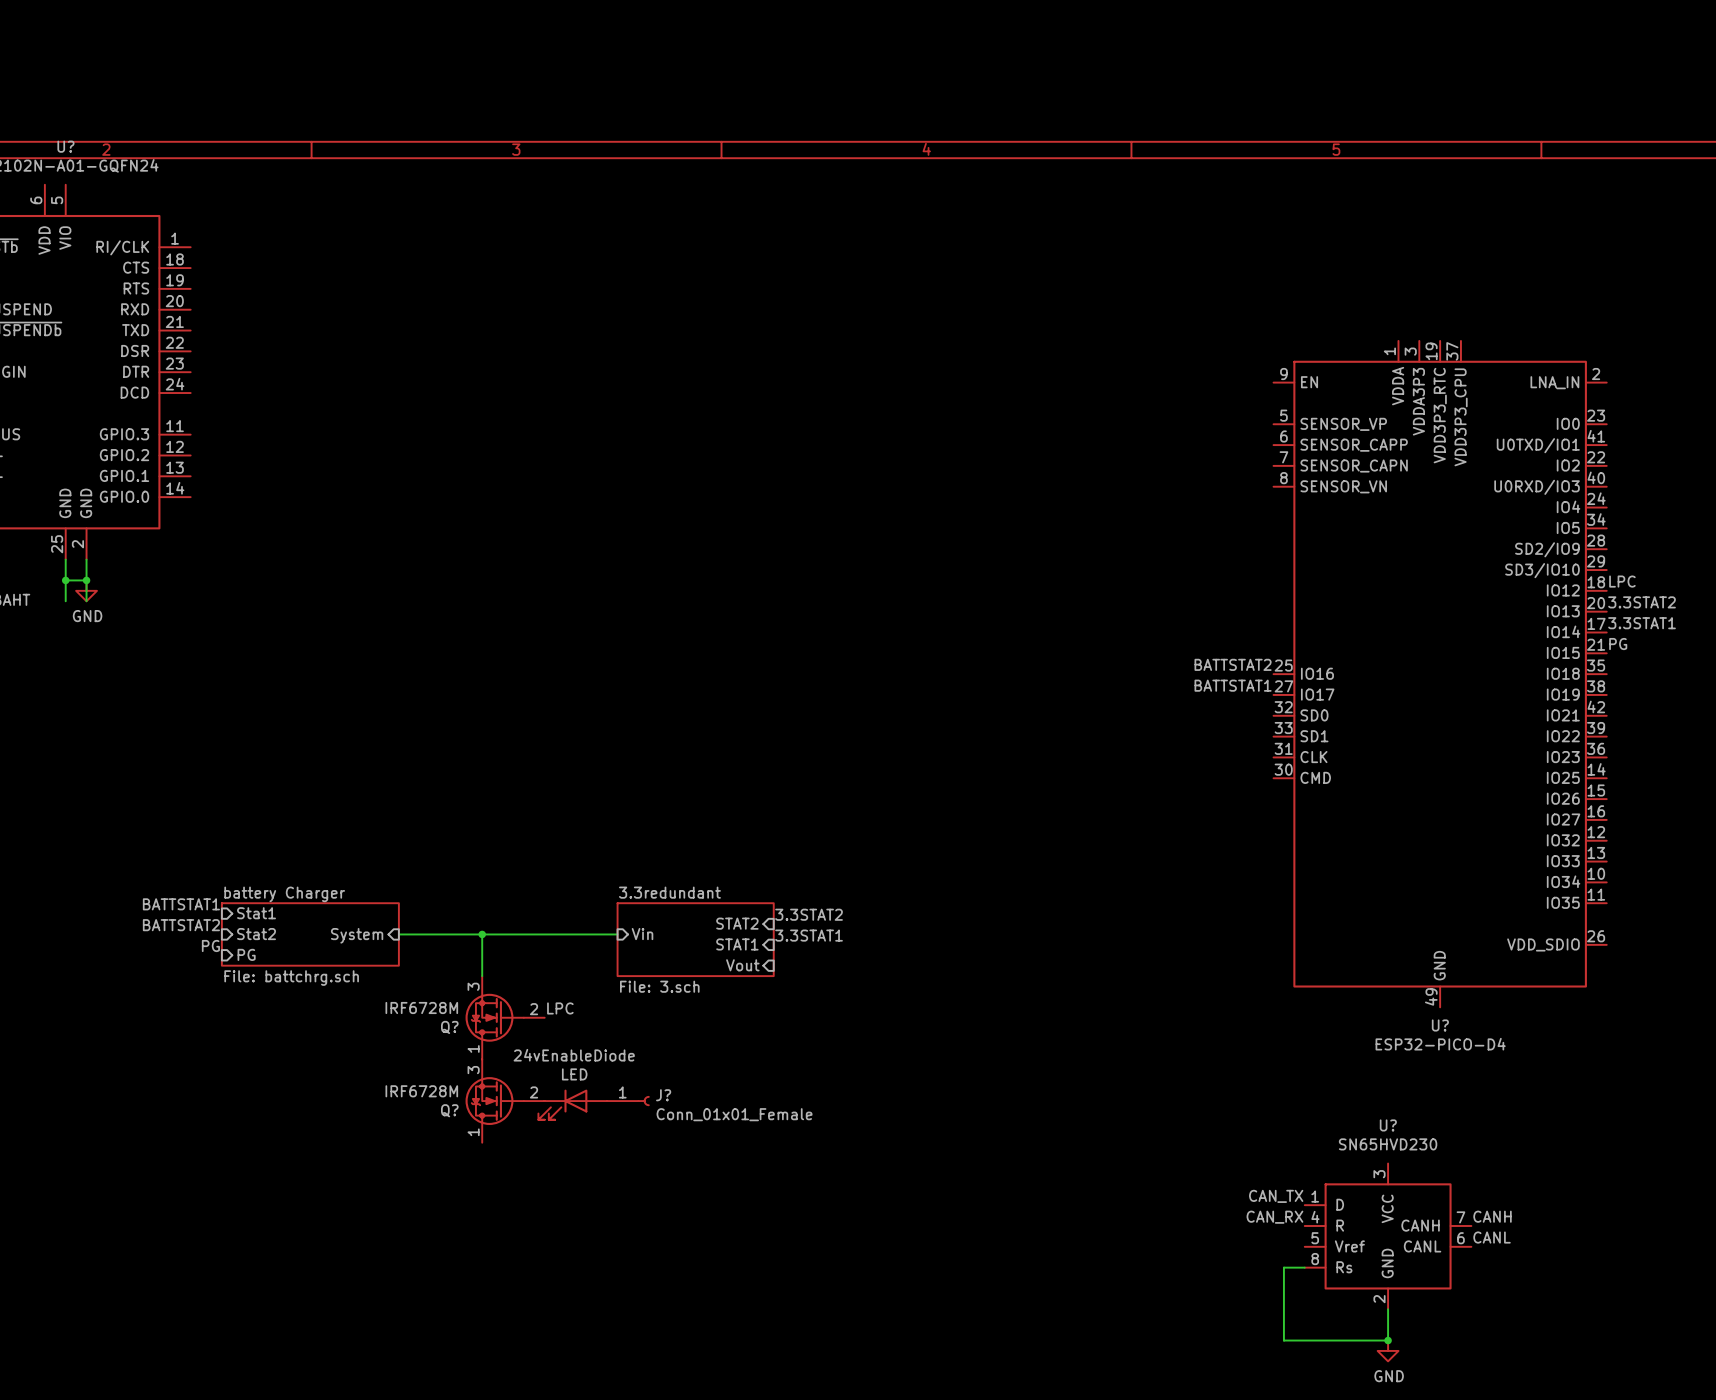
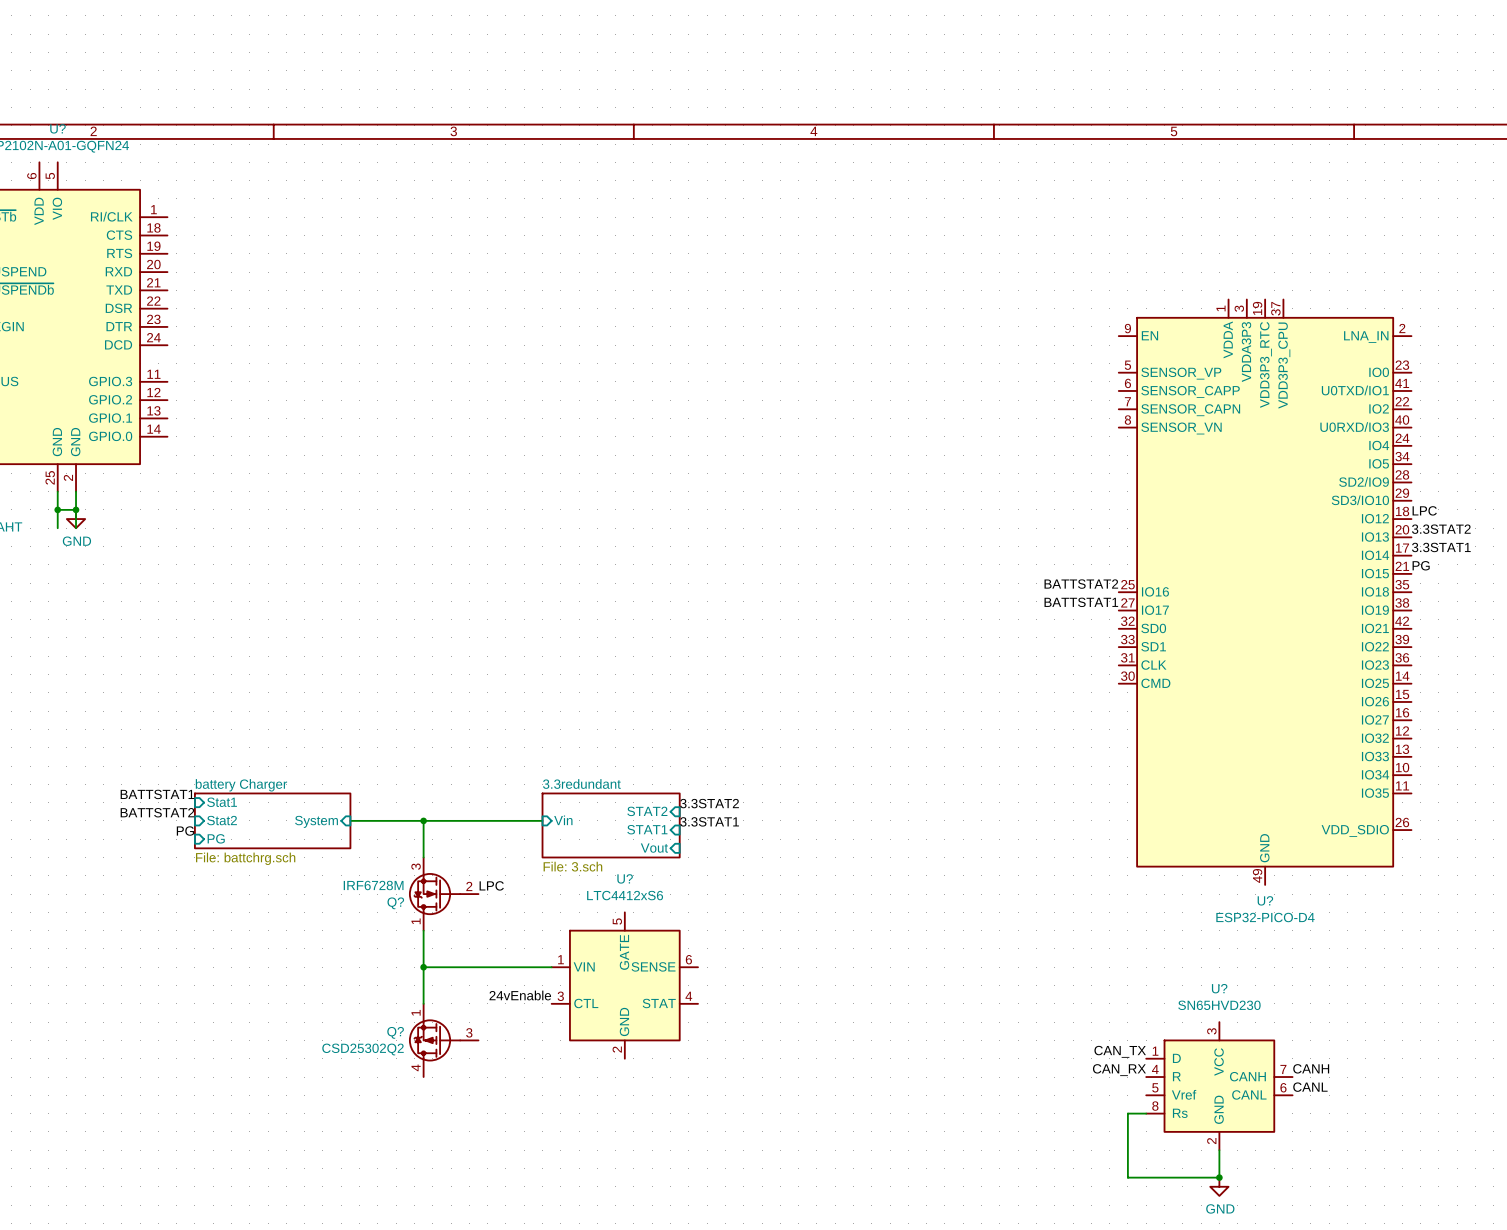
junction: none -> (423, 967)
Q?: IRF6728M (505, 1101) -> none
J?: Conn_01x01_Female (628, 1101) -> none
24vEnableDiode: LED (572, 1104) -> none
U?: none -> LTC4412xS6 (624, 985)
label: none -> 24vEnable (520, 995)
Q?: none -> CSD25302Q2 (443, 1040)

